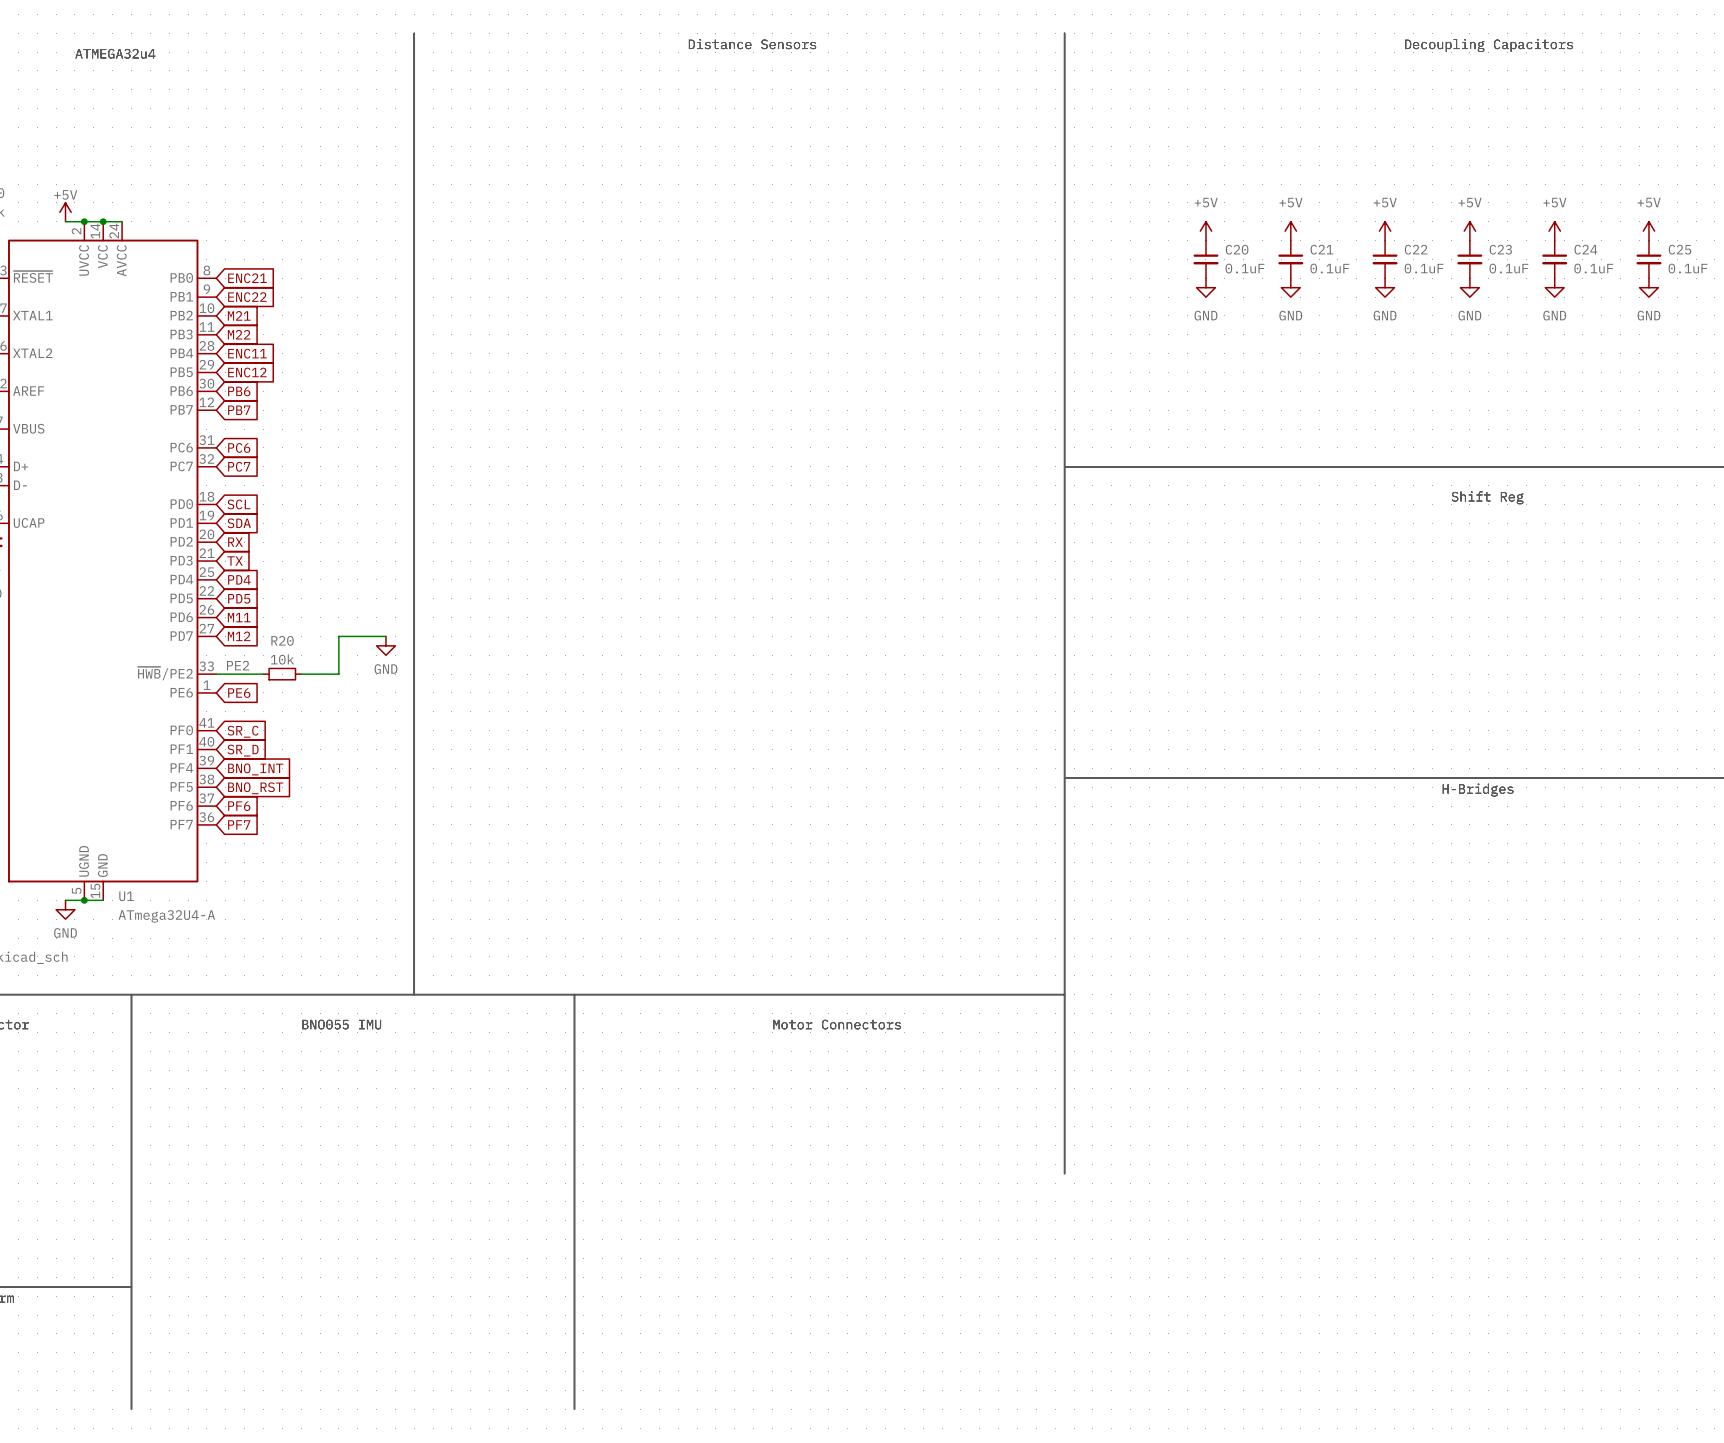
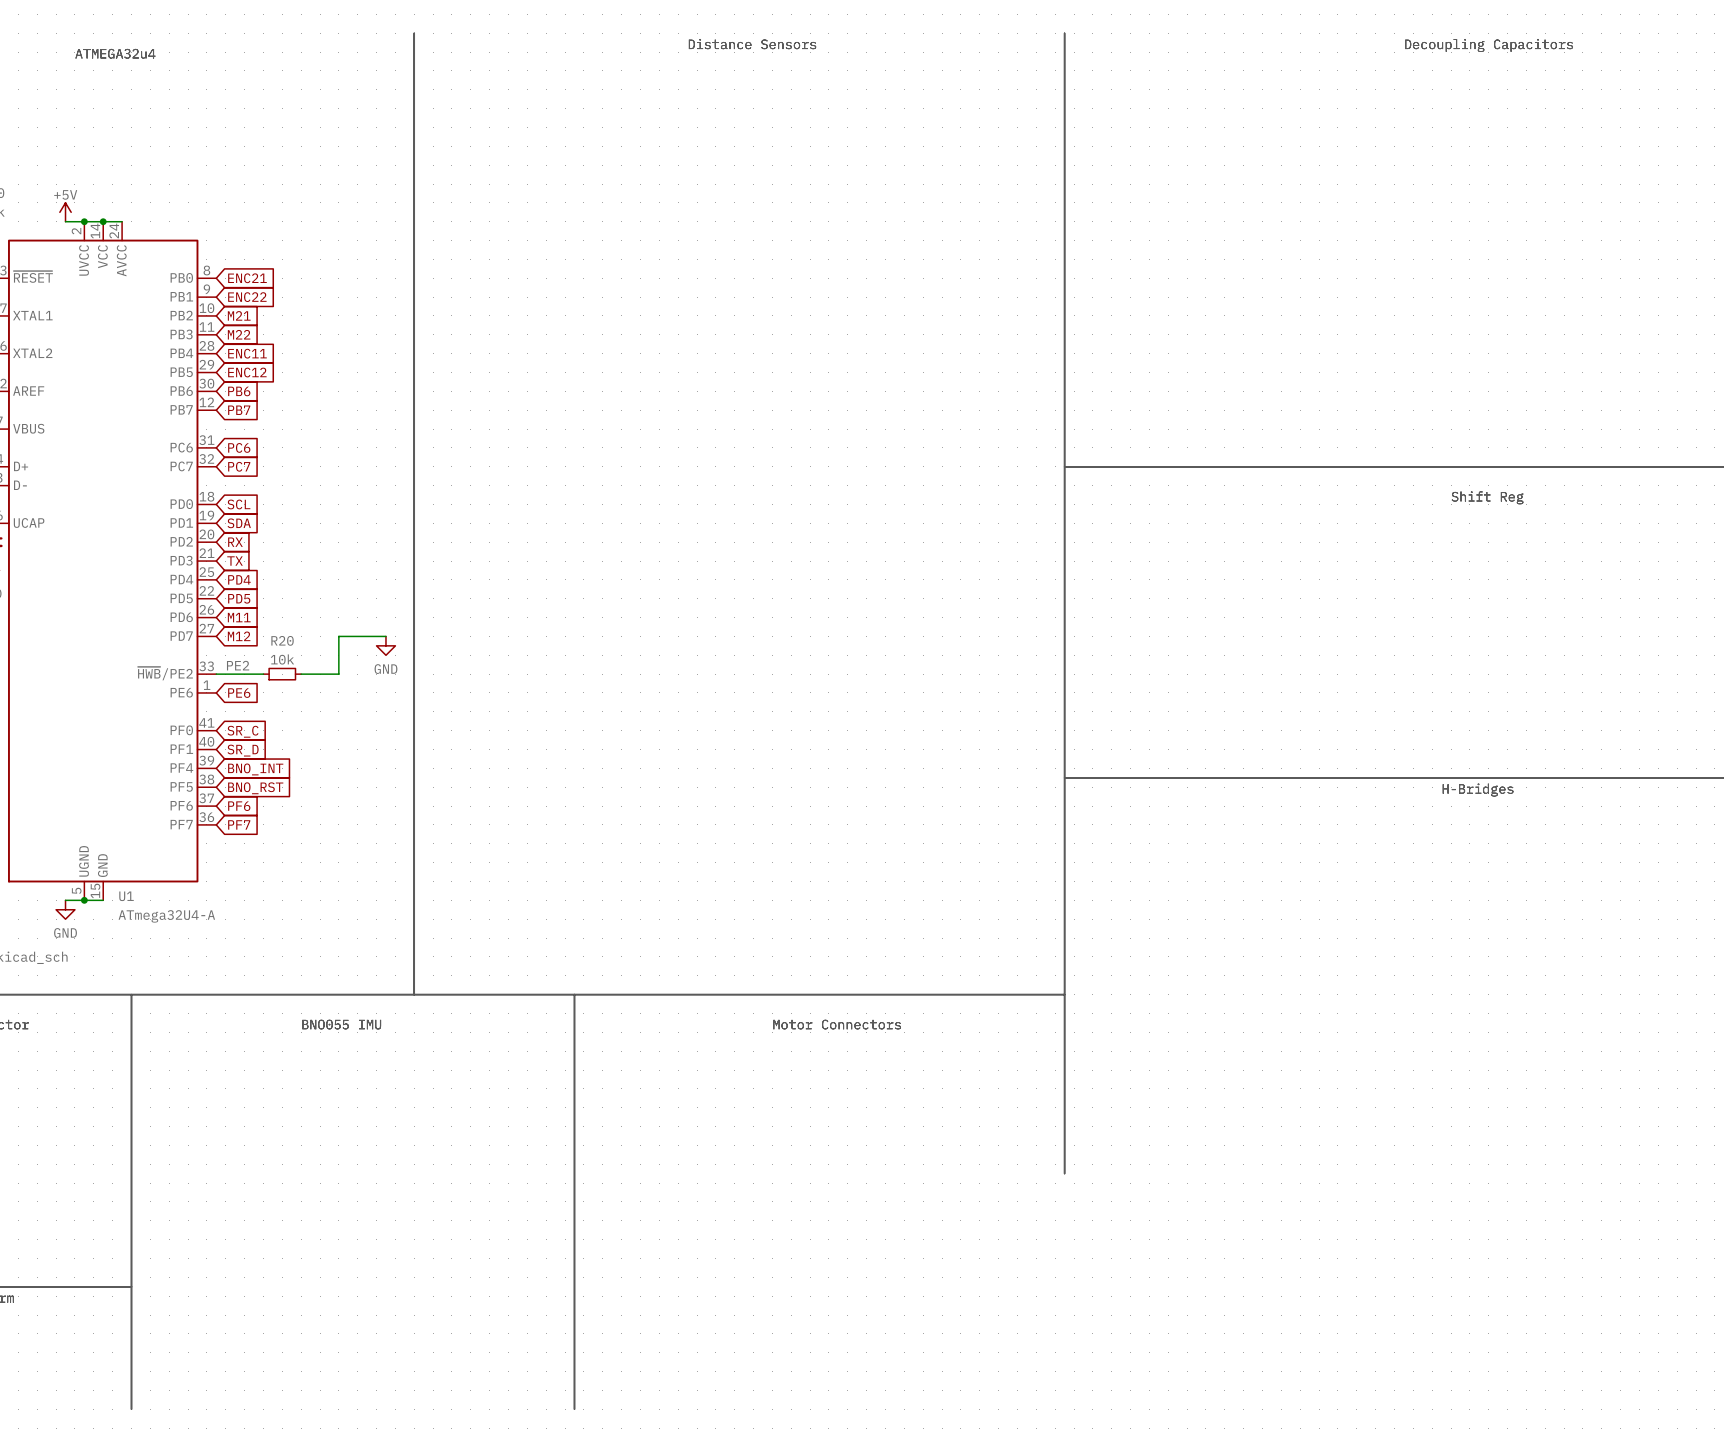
power symbol: +5V (1205, 231) -> none
power symbol: +5V (1290, 231) -> none
power symbol: +5V (1385, 231) -> none
power symbol: +5V (1469, 231) -> none
power symbol: +5V (1554, 231) -> none
power symbol: +5V (1648, 231) -> none
C20: 0.1uF (1205, 259) -> none
C21: 0.1uF (1290, 259) -> none
C22: 0.1uF (1385, 259) -> none
C23: 0.1uF (1469, 259) -> none
C24: 0.1uF (1554, 259) -> none
C25: 0.1uF (1648, 259) -> none
power symbol: GND (1205, 287) -> none
power symbol: GND (1290, 287) -> none
power symbol: GND (1385, 287) -> none
power symbol: GND (1469, 287) -> none
power symbol: GND (1554, 287) -> none
power symbol: GND (1648, 287) -> none

